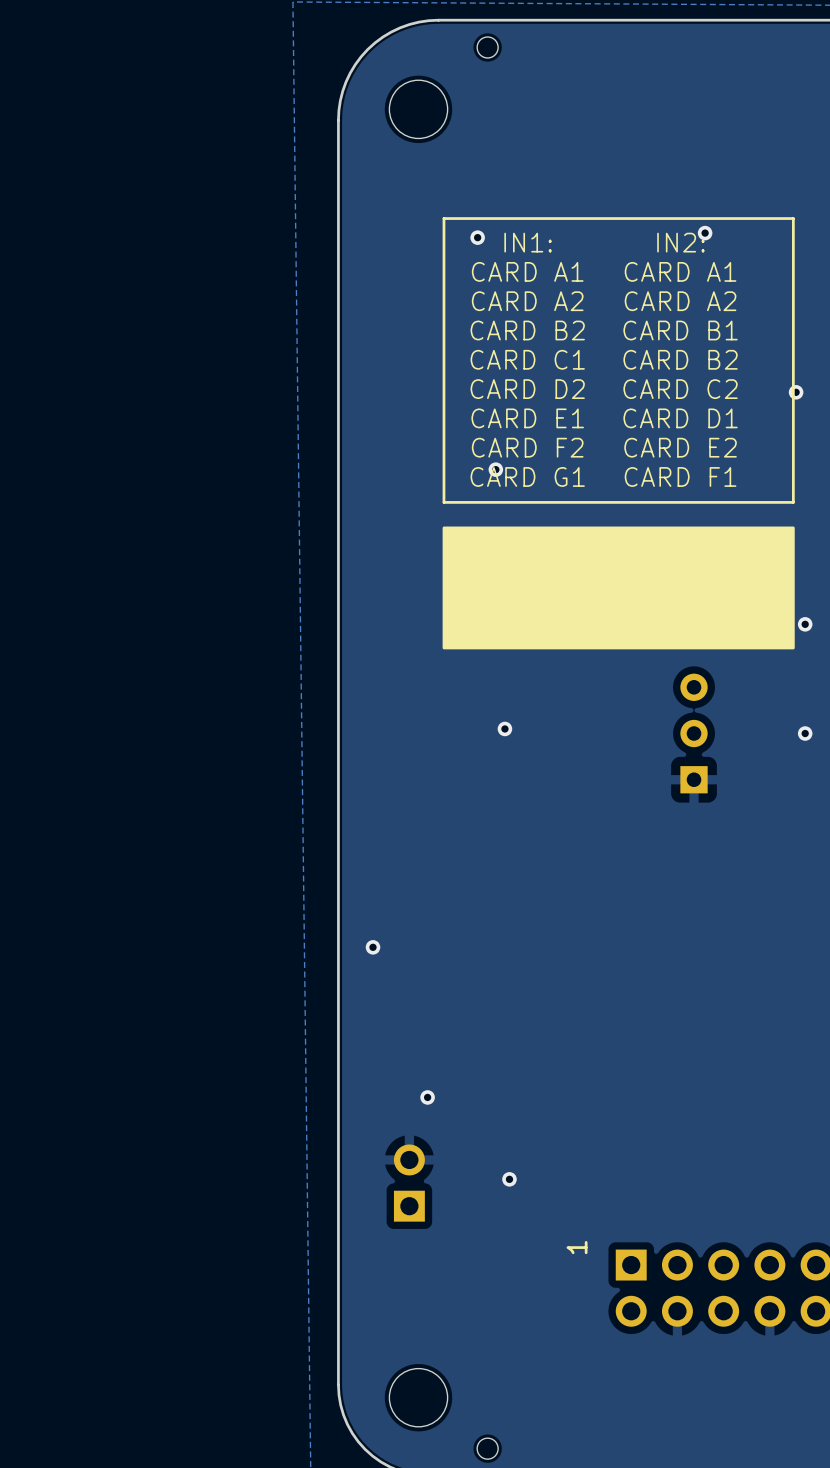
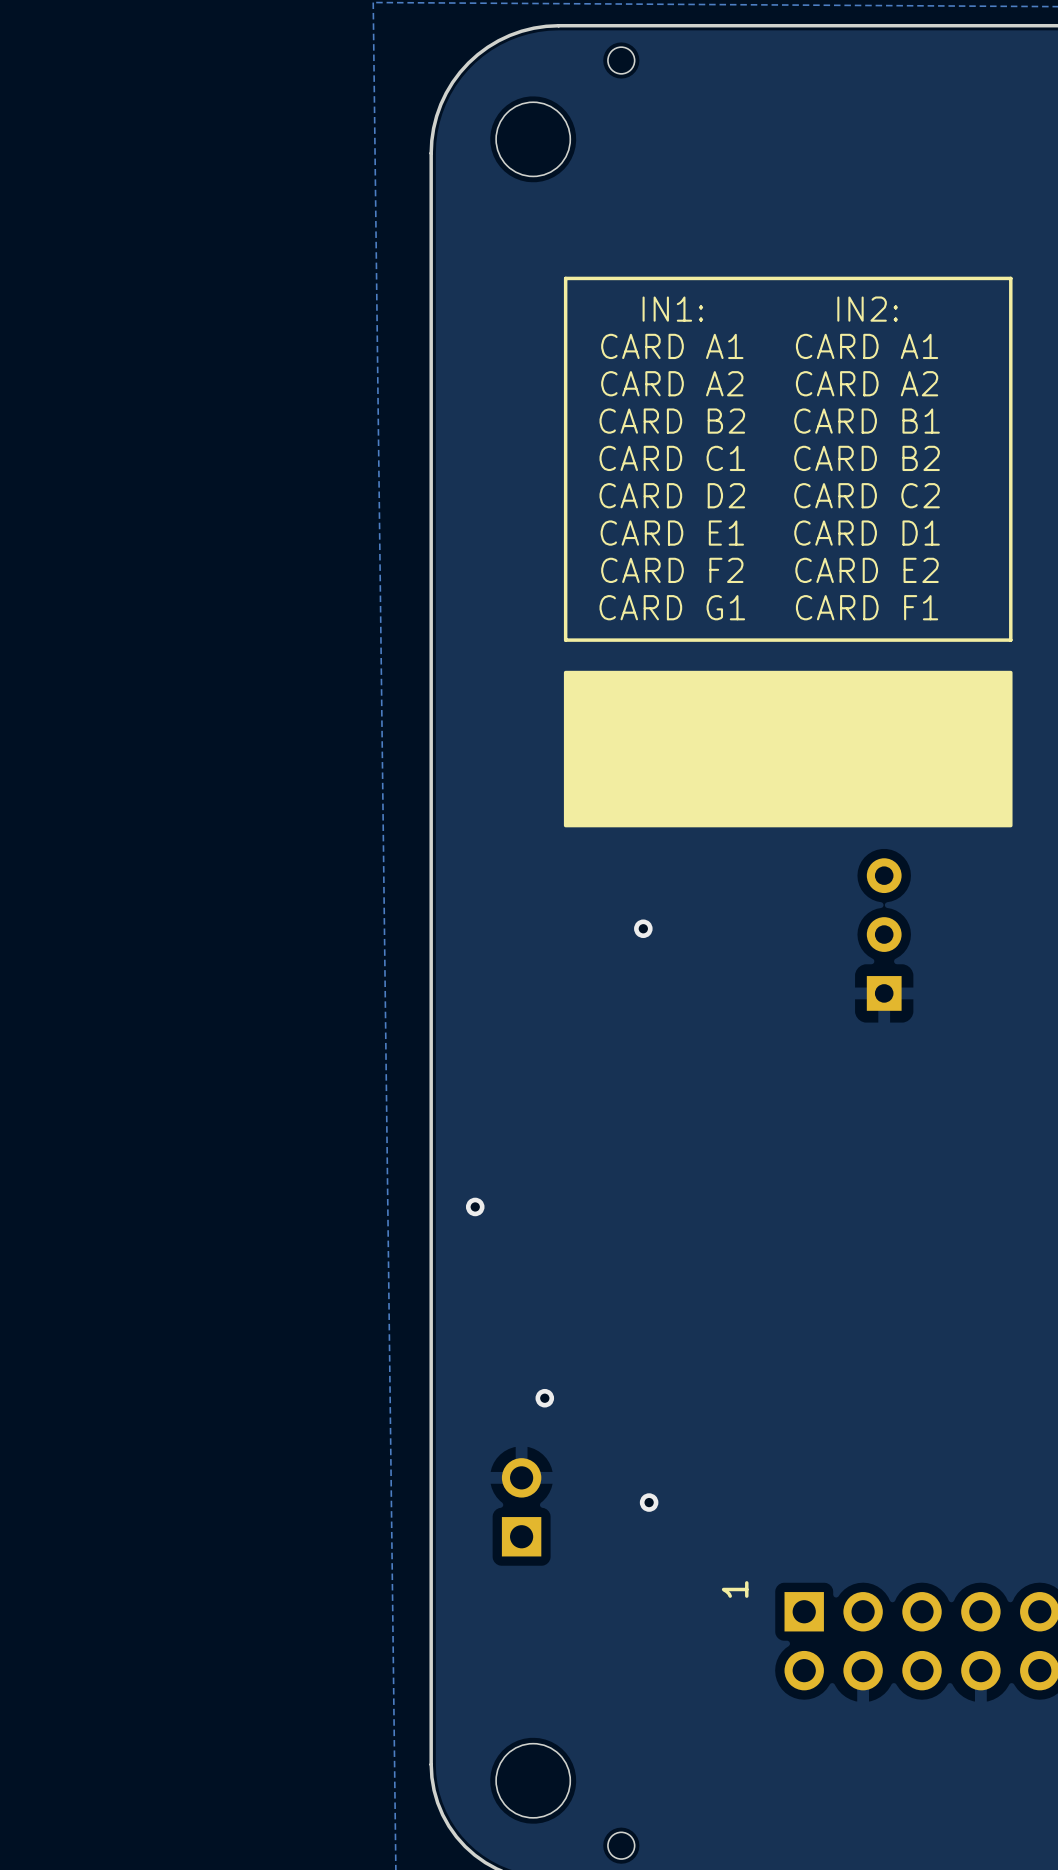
via: (705, 233) -> none
via: (477, 237) -> none
via: (796, 392) -> none
via: (495, 469) -> none
via: (805, 624) -> none
via: (805, 733) -> none

